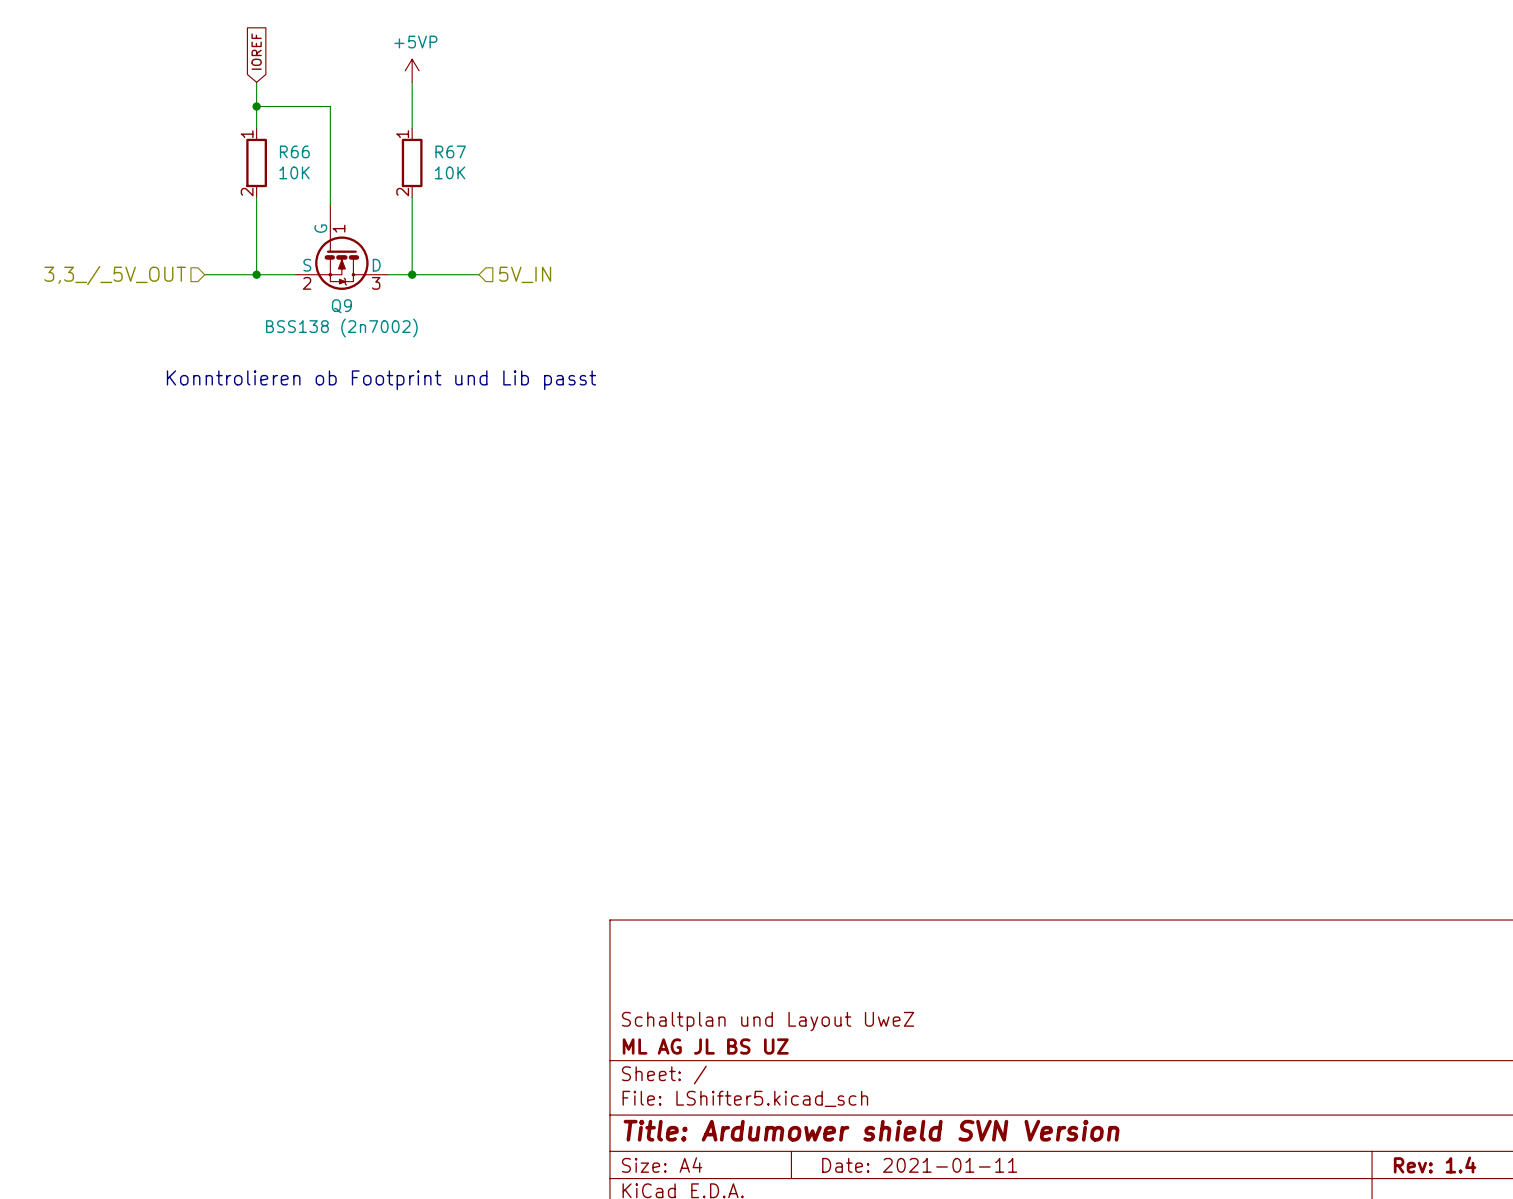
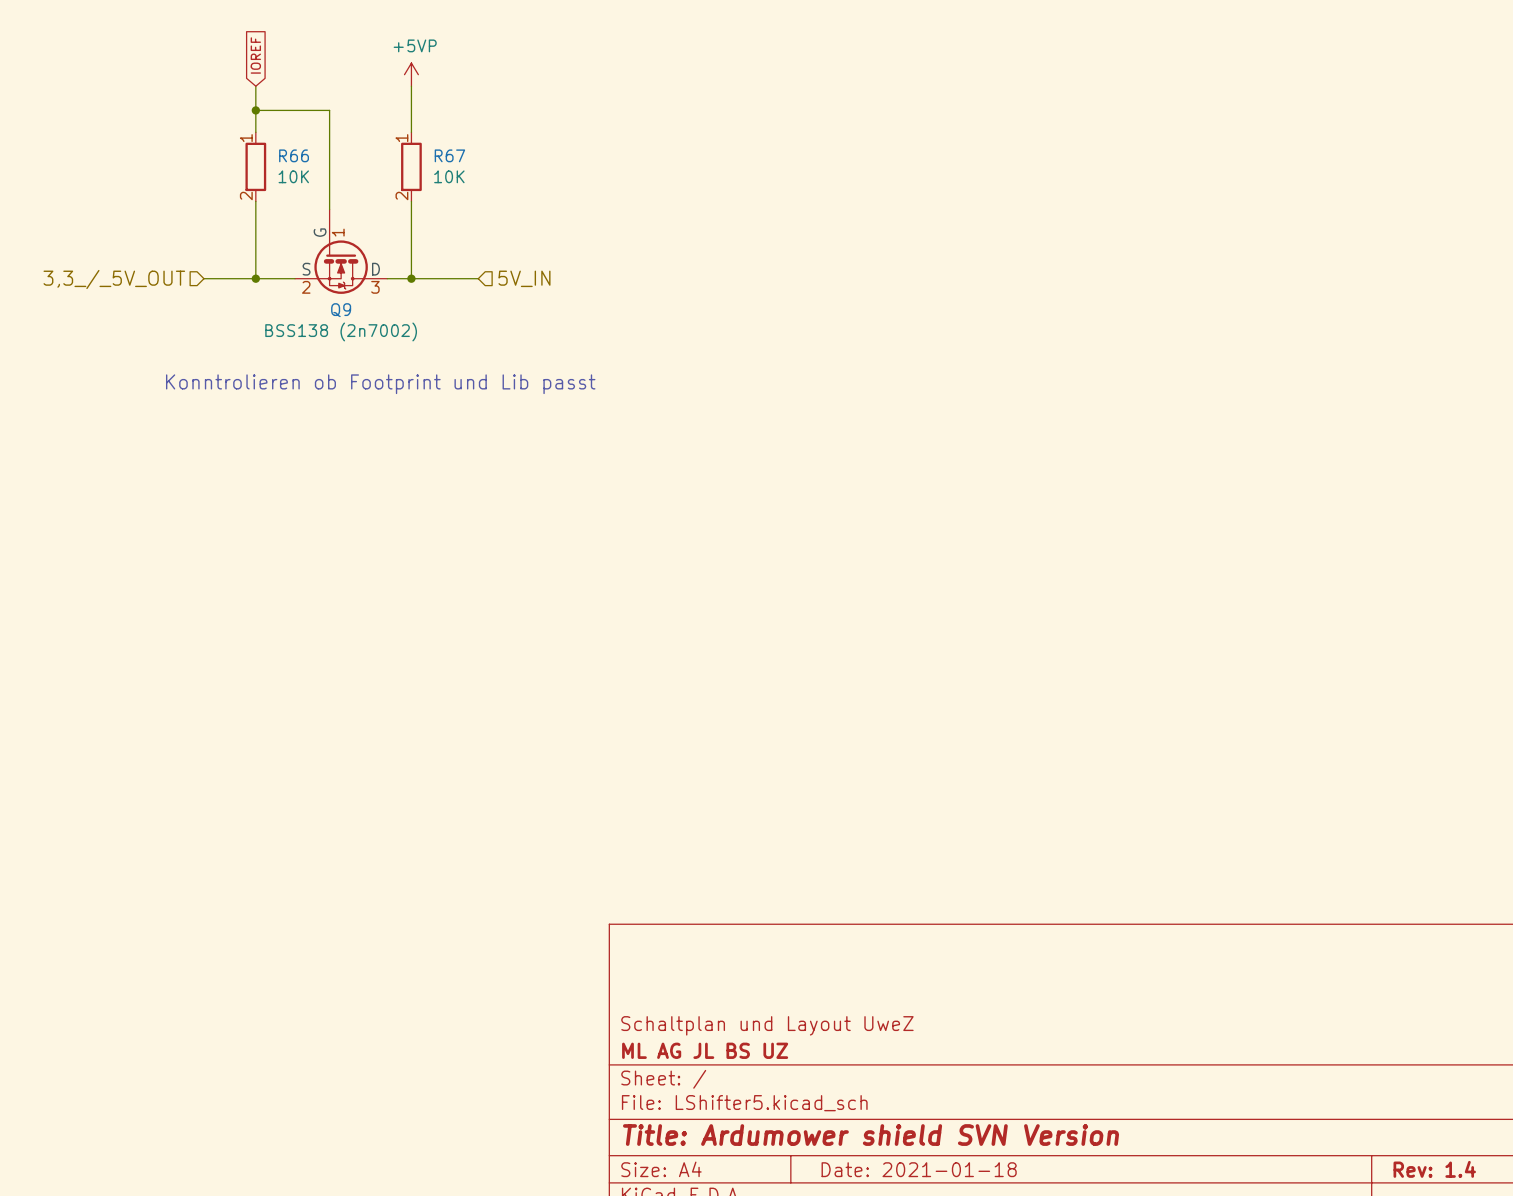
title block: Date: 2021-01-11 (919, 1165) -> Date: 2021-01-18 (919, 1169)

